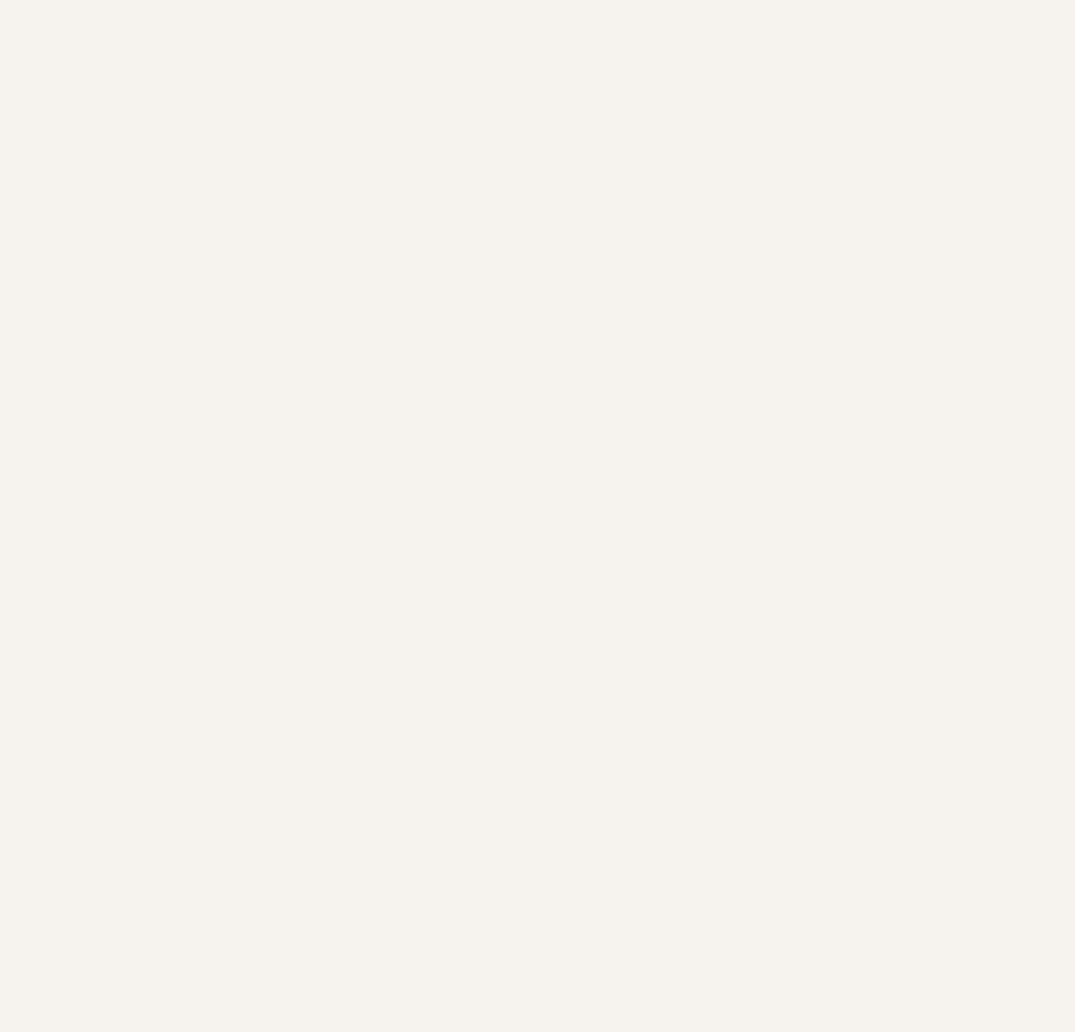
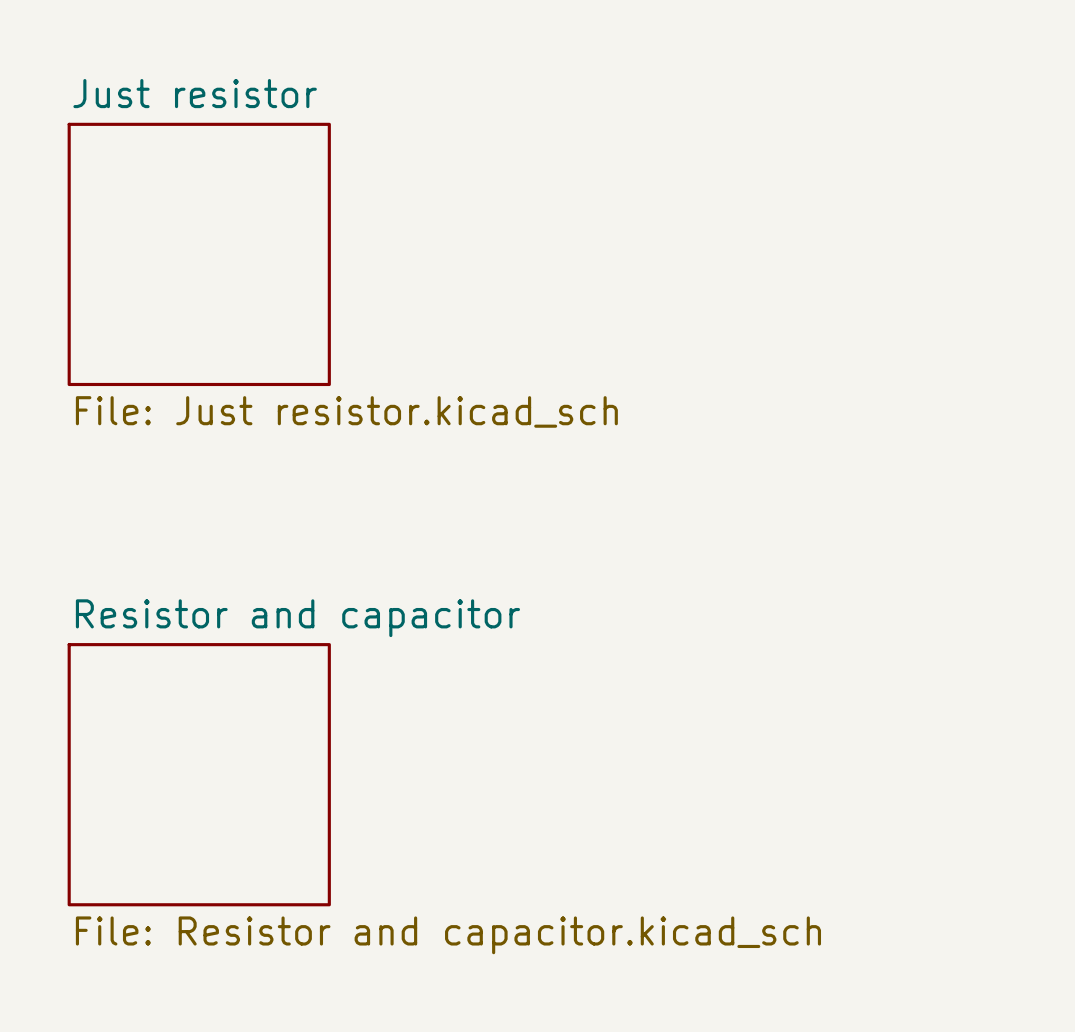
sheet Just resistor: none -> File: Just resistor.kicad_sch (199, 254)
sheet Resistor and capacitor: none -> File: Resistor and capacitor.kicad_sch (199, 774)

